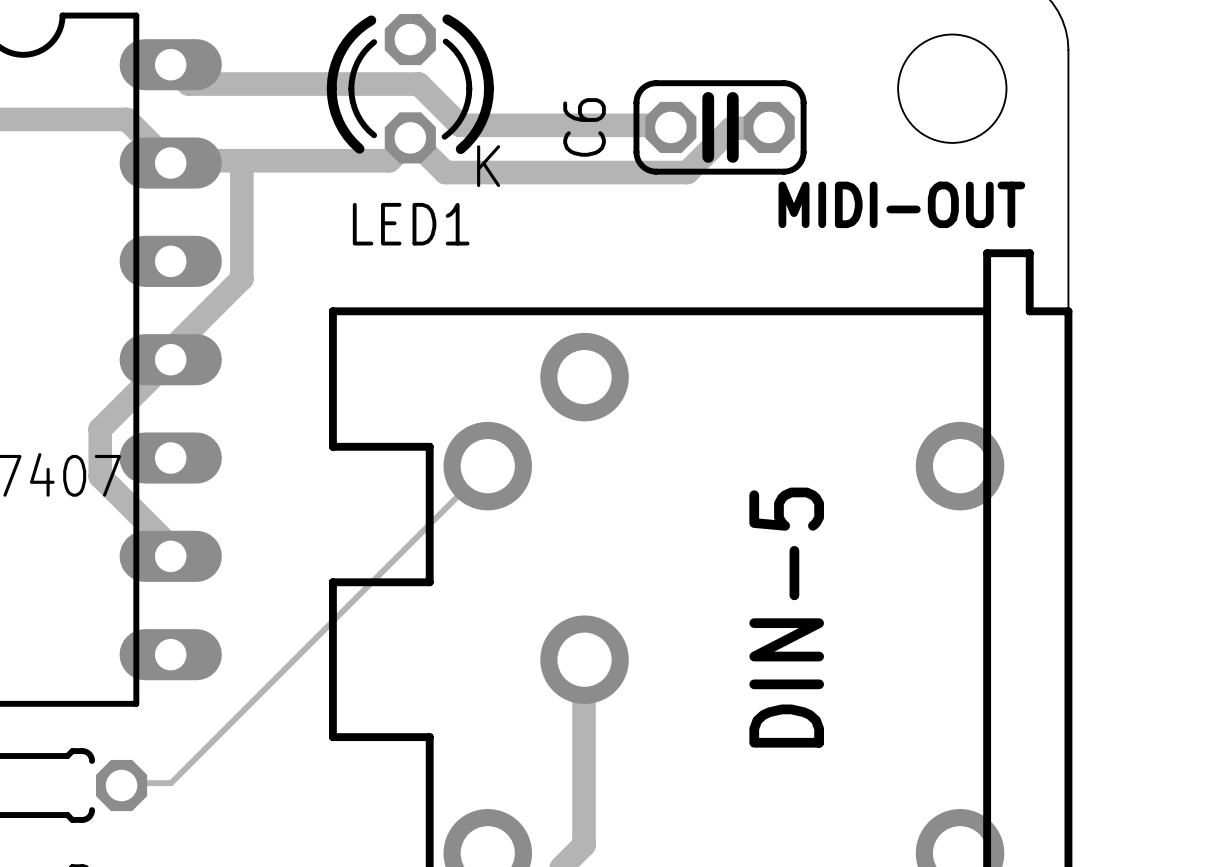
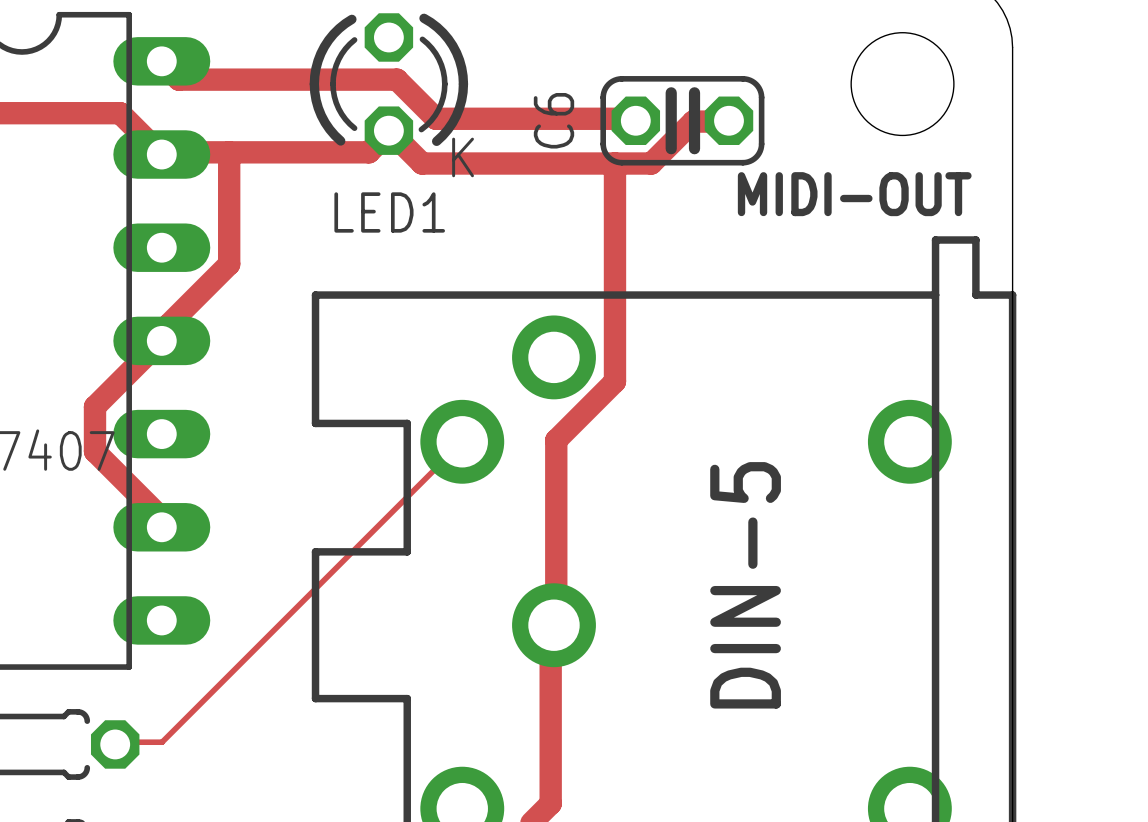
track: (584, 659) (584, 845) (581, 848) -> (614, 163) (614, 381) (556, 440) (556, 624) (553, 625) (550, 635) (550, 803)

